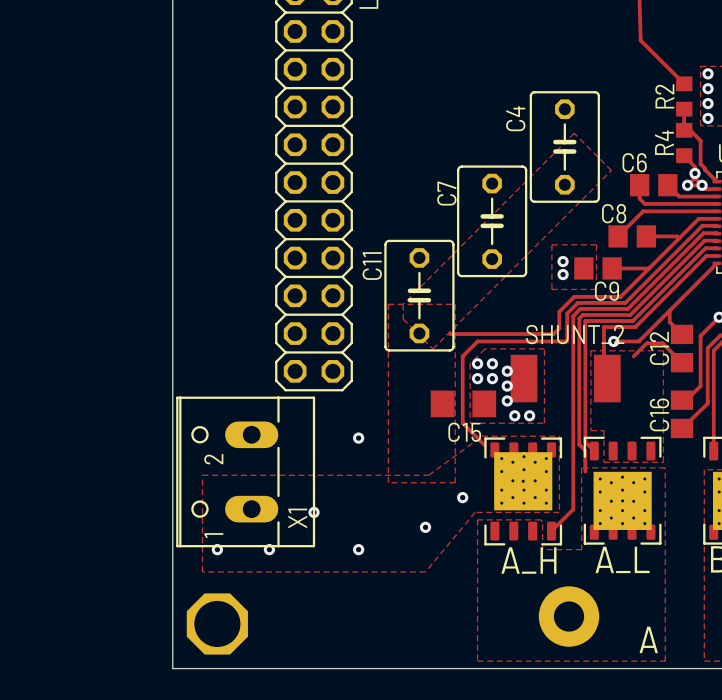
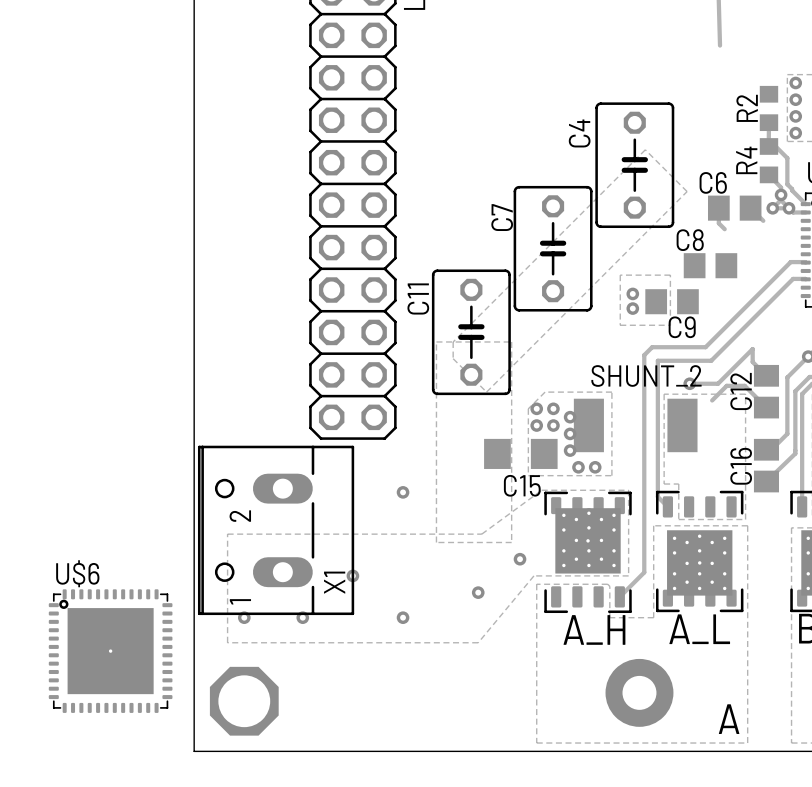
track: (640, 40) (684, 83) -> none
track: (679, 196) (716, 196) -> none
track: (644, 203) (716, 203) -> none
track: (716, 211) (643, 211) (618, 236) -> none
track: (716, 218) (698, 218) (620, 296) (574, 296) (559, 311) (559, 328) (553, 334) (449, 334) -> none
track: (716, 226) (702, 225) (625, 302) (577, 302) (567, 313) (566, 341) (477, 341) (462, 356) (462, 423) (485, 445) -> none
track: (646, 236) (677, 236) (679, 238) -> none
track: (716, 241) (704, 240) (630, 314) (582, 314) (579, 318) (579, 444) (585, 450) (585, 471) -> none
track: (716, 255) (706, 255) (635, 327) (603, 327) (603, 363) -> none
track: (716, 263) (669, 310) -> none
track: (612, 268) (649, 268) -> none
U$6: none -> (110, 651)

